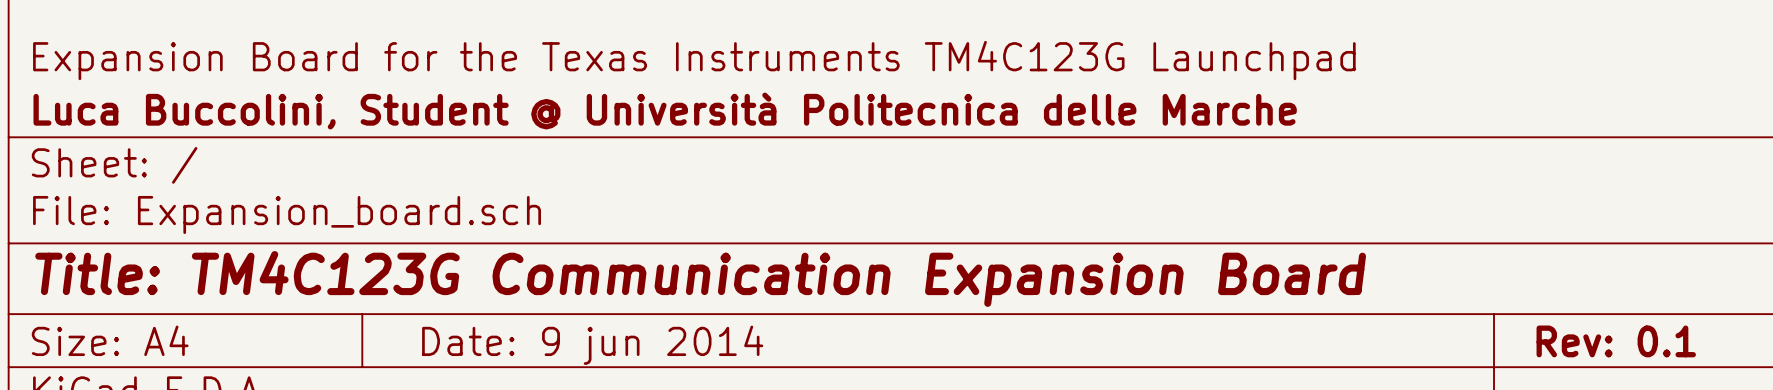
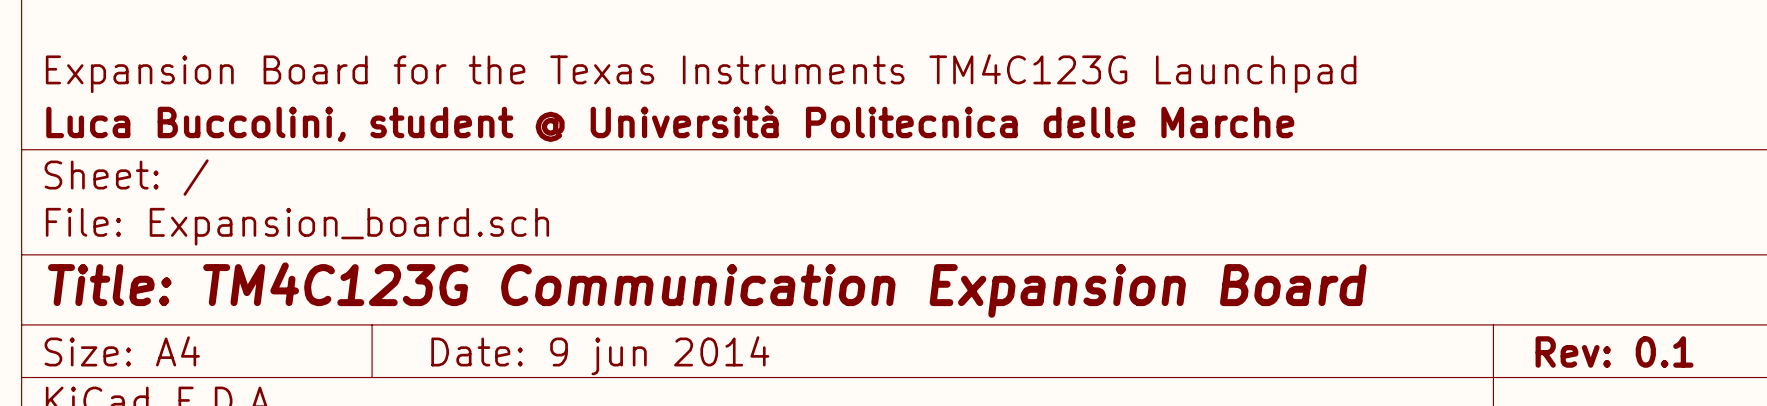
title block: Luca Buccolini, Student @ Università Politecnica delle Marche (665, 111) -> Luca Buccolini, student @ Università Politecnica delle Marche (670, 123)

